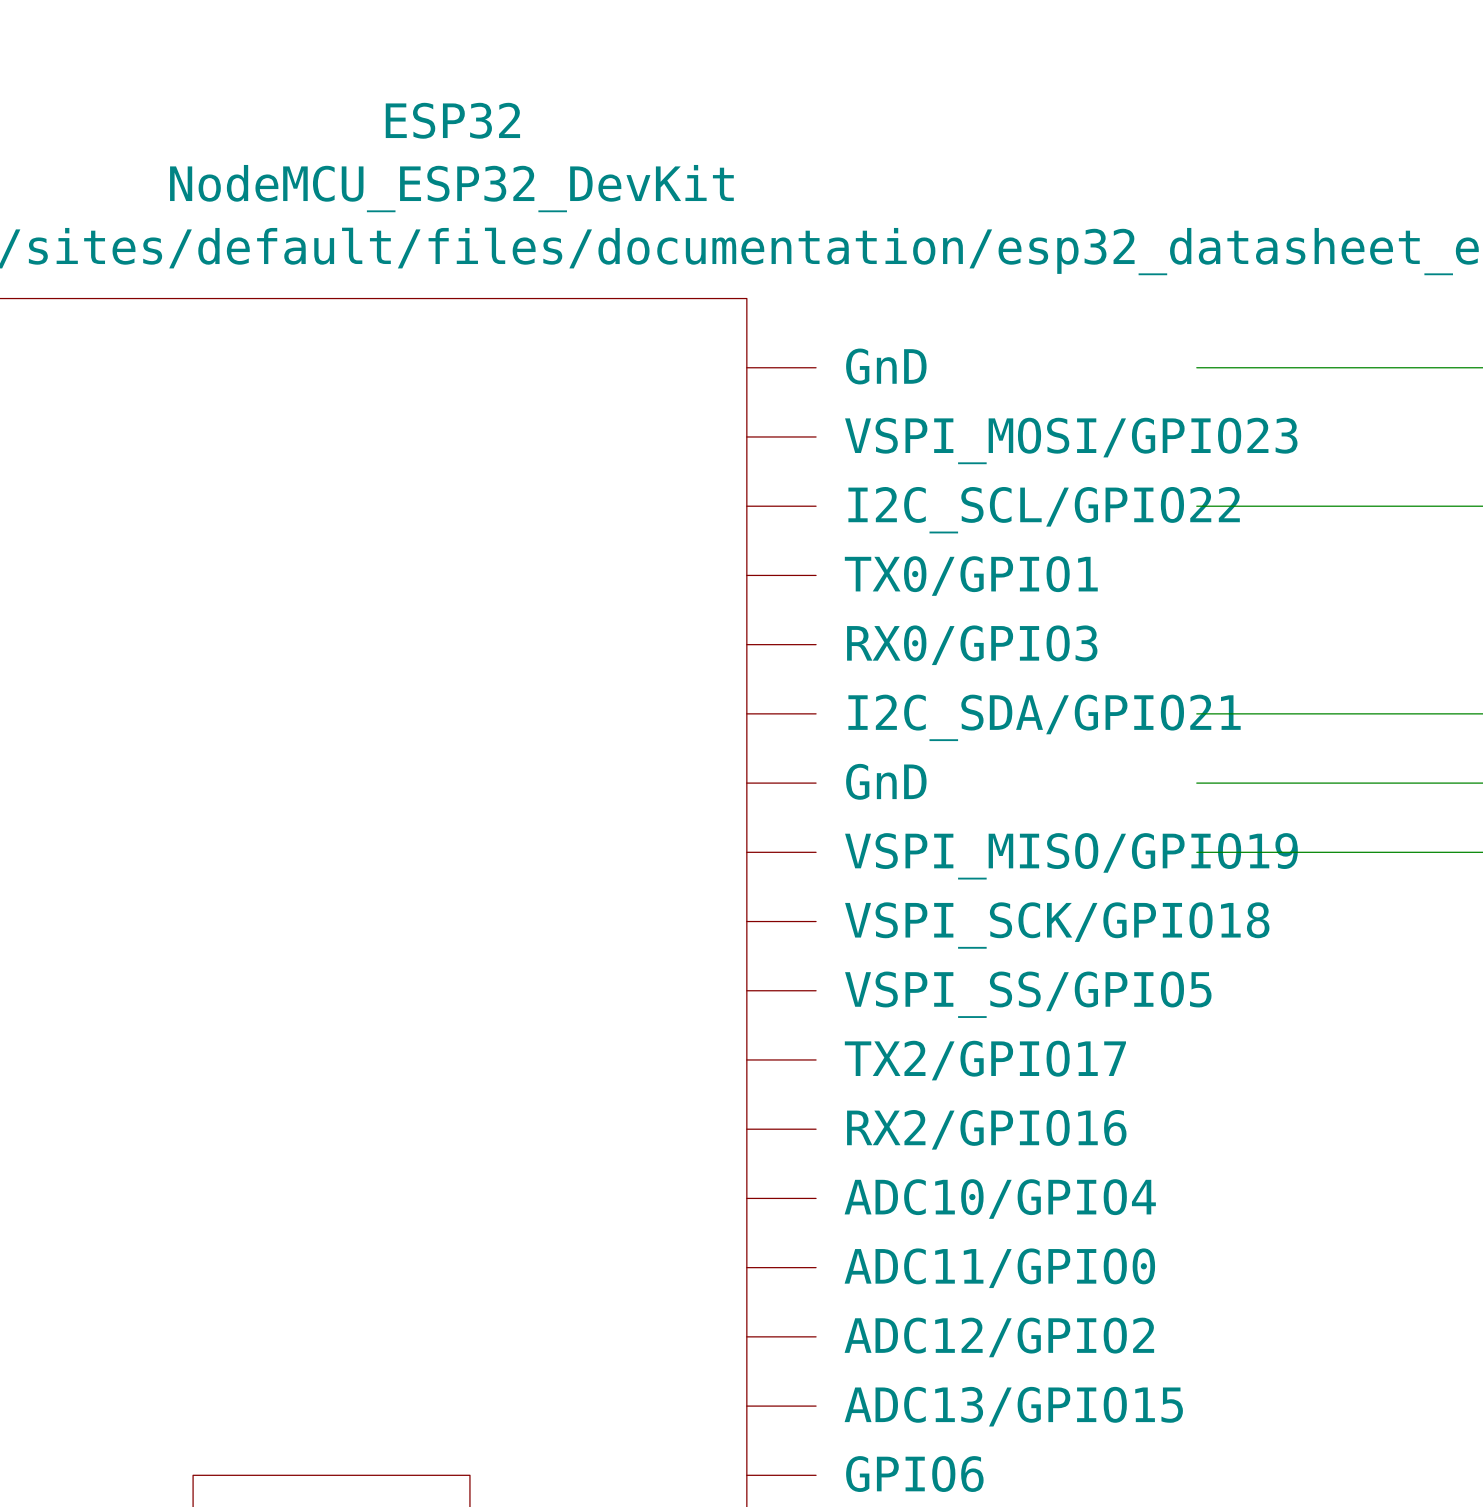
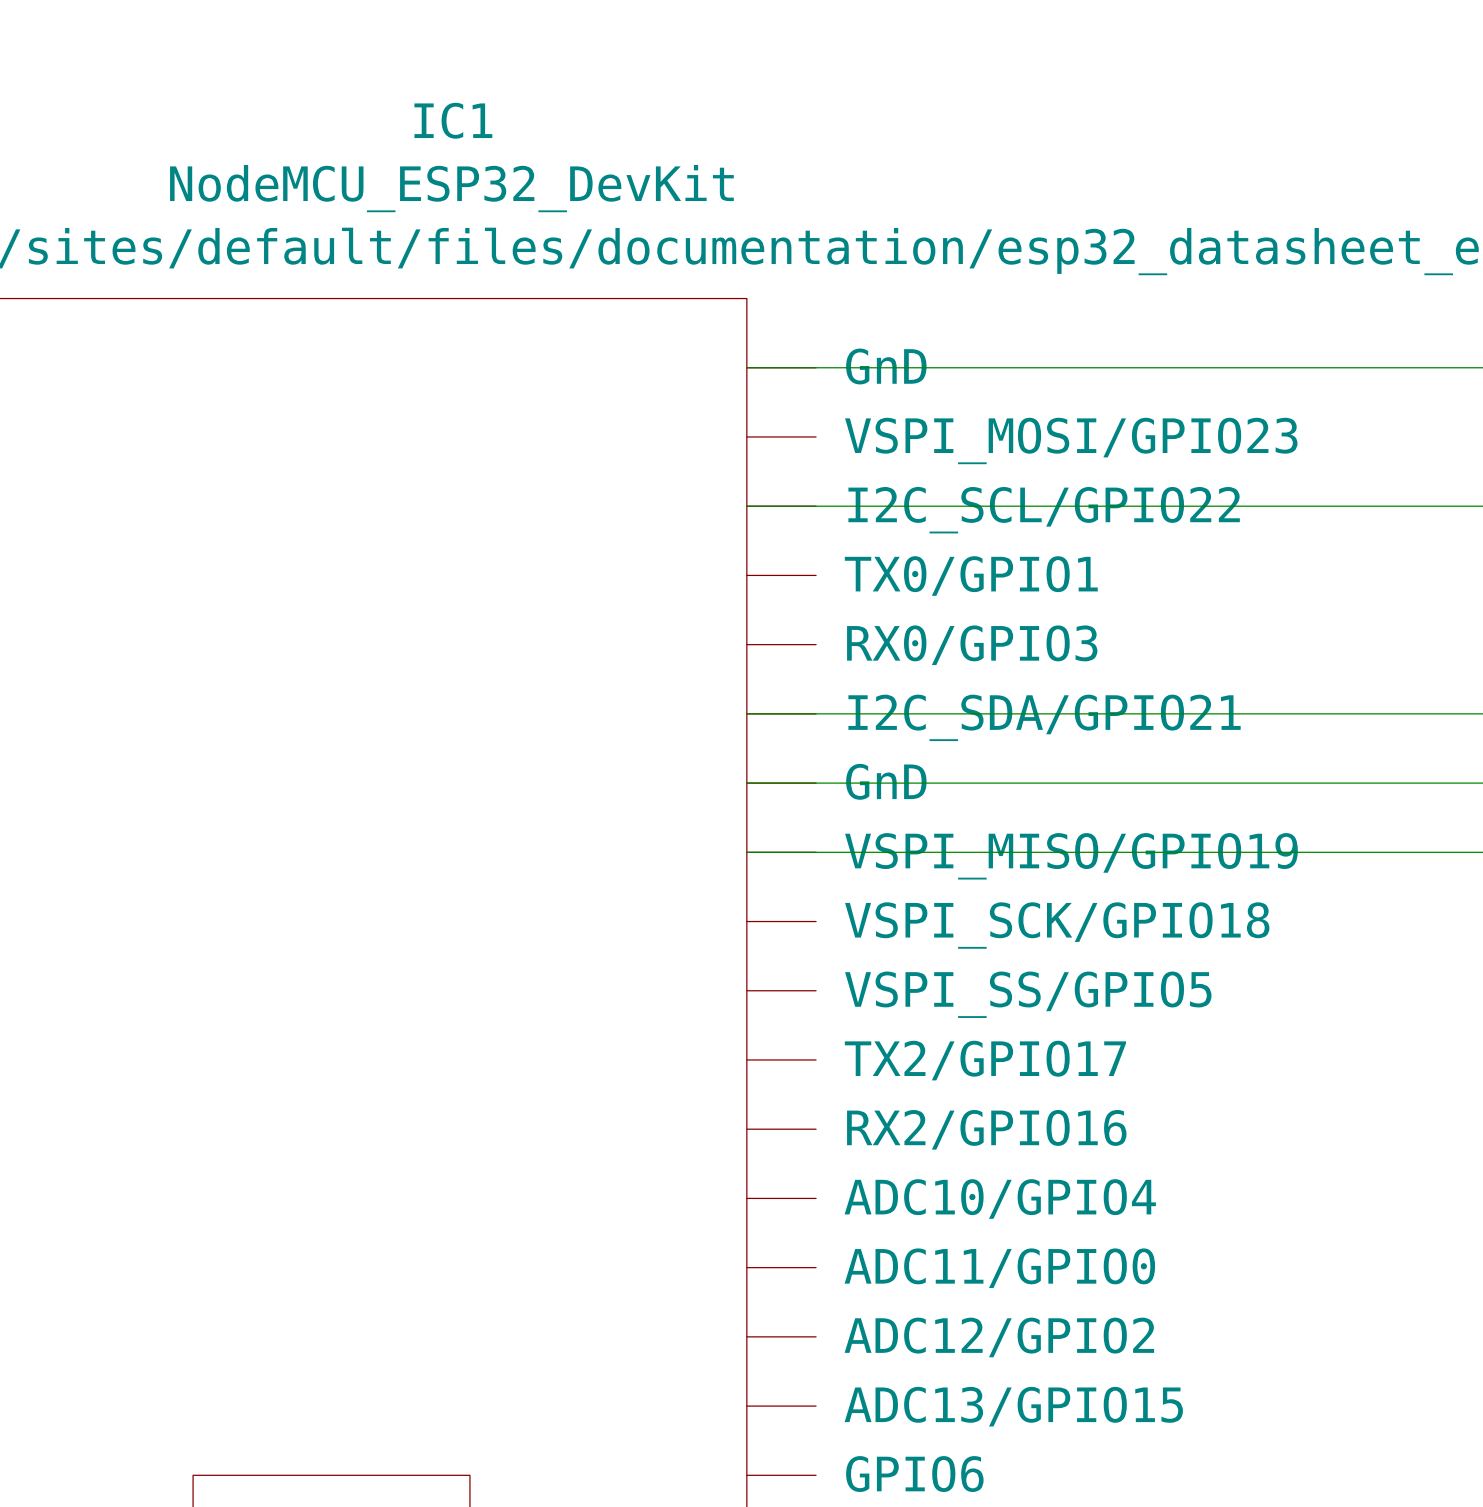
ESP32 name: ESP32 (452, 120) -> IC1 (453, 120)
wire: none -> (746, 367) (1196, 367)
wire: none -> (746, 506) (1196, 506)
wire: none -> (746, 713) (1196, 713)
wire: none -> (746, 783) (1196, 783)
wire: none -> (746, 852) (1196, 852)

